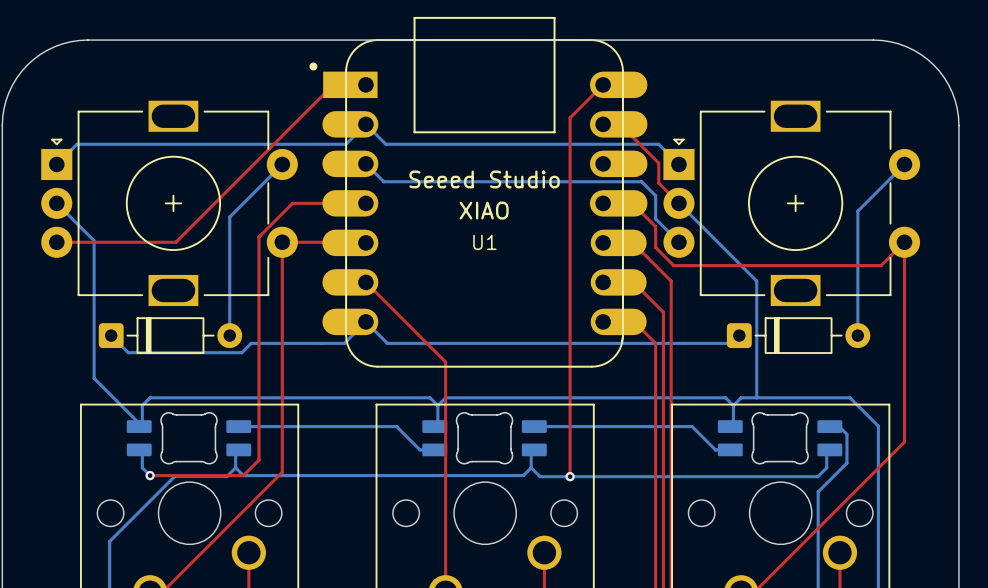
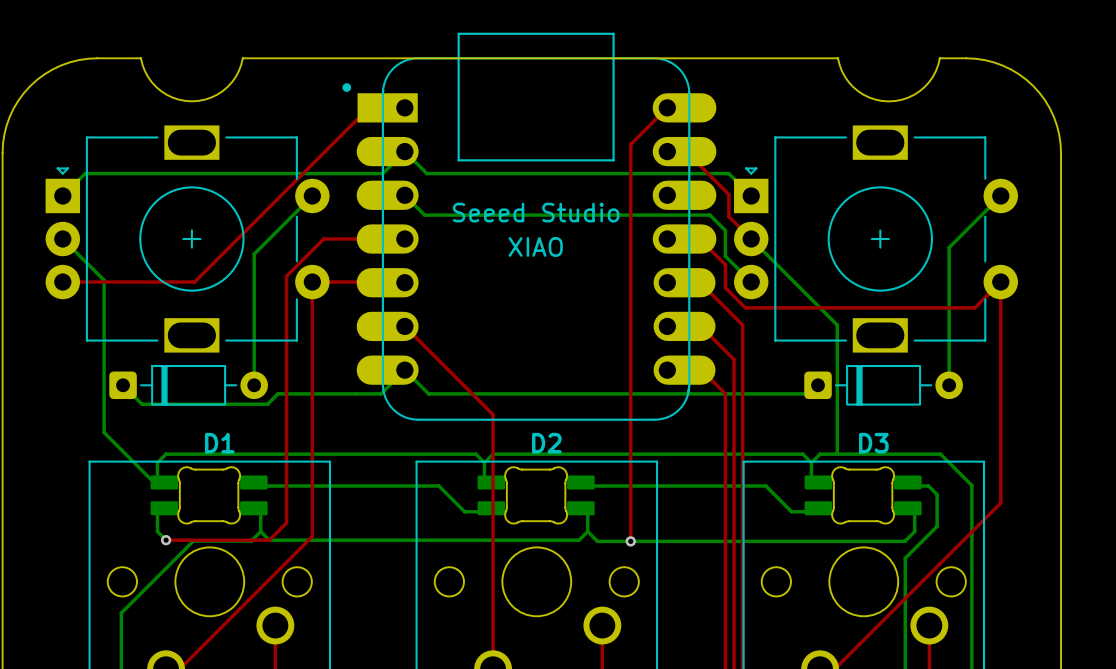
board edge: (127, 40) (219, 40) -> (140, 58) (147, 76) (161, 91) (178, 99) (191, 101) (211, 97) (227, 86) (235, 76) (242, 58)
board edge: (757, 40) (849, 40) -> (838, 58) (844, 76) (858, 91) (875, 99) (888, 101) (908, 97) (924, 86) (932, 76) (939, 58)
U1 name: U1 (484, 242) -> none
D1: none -> (209, 495)
D2: none -> (536, 495)
D3: none -> (863, 495)
part: (188, 438) -> none
part: (484, 438) -> none
part: (780, 438) -> none

